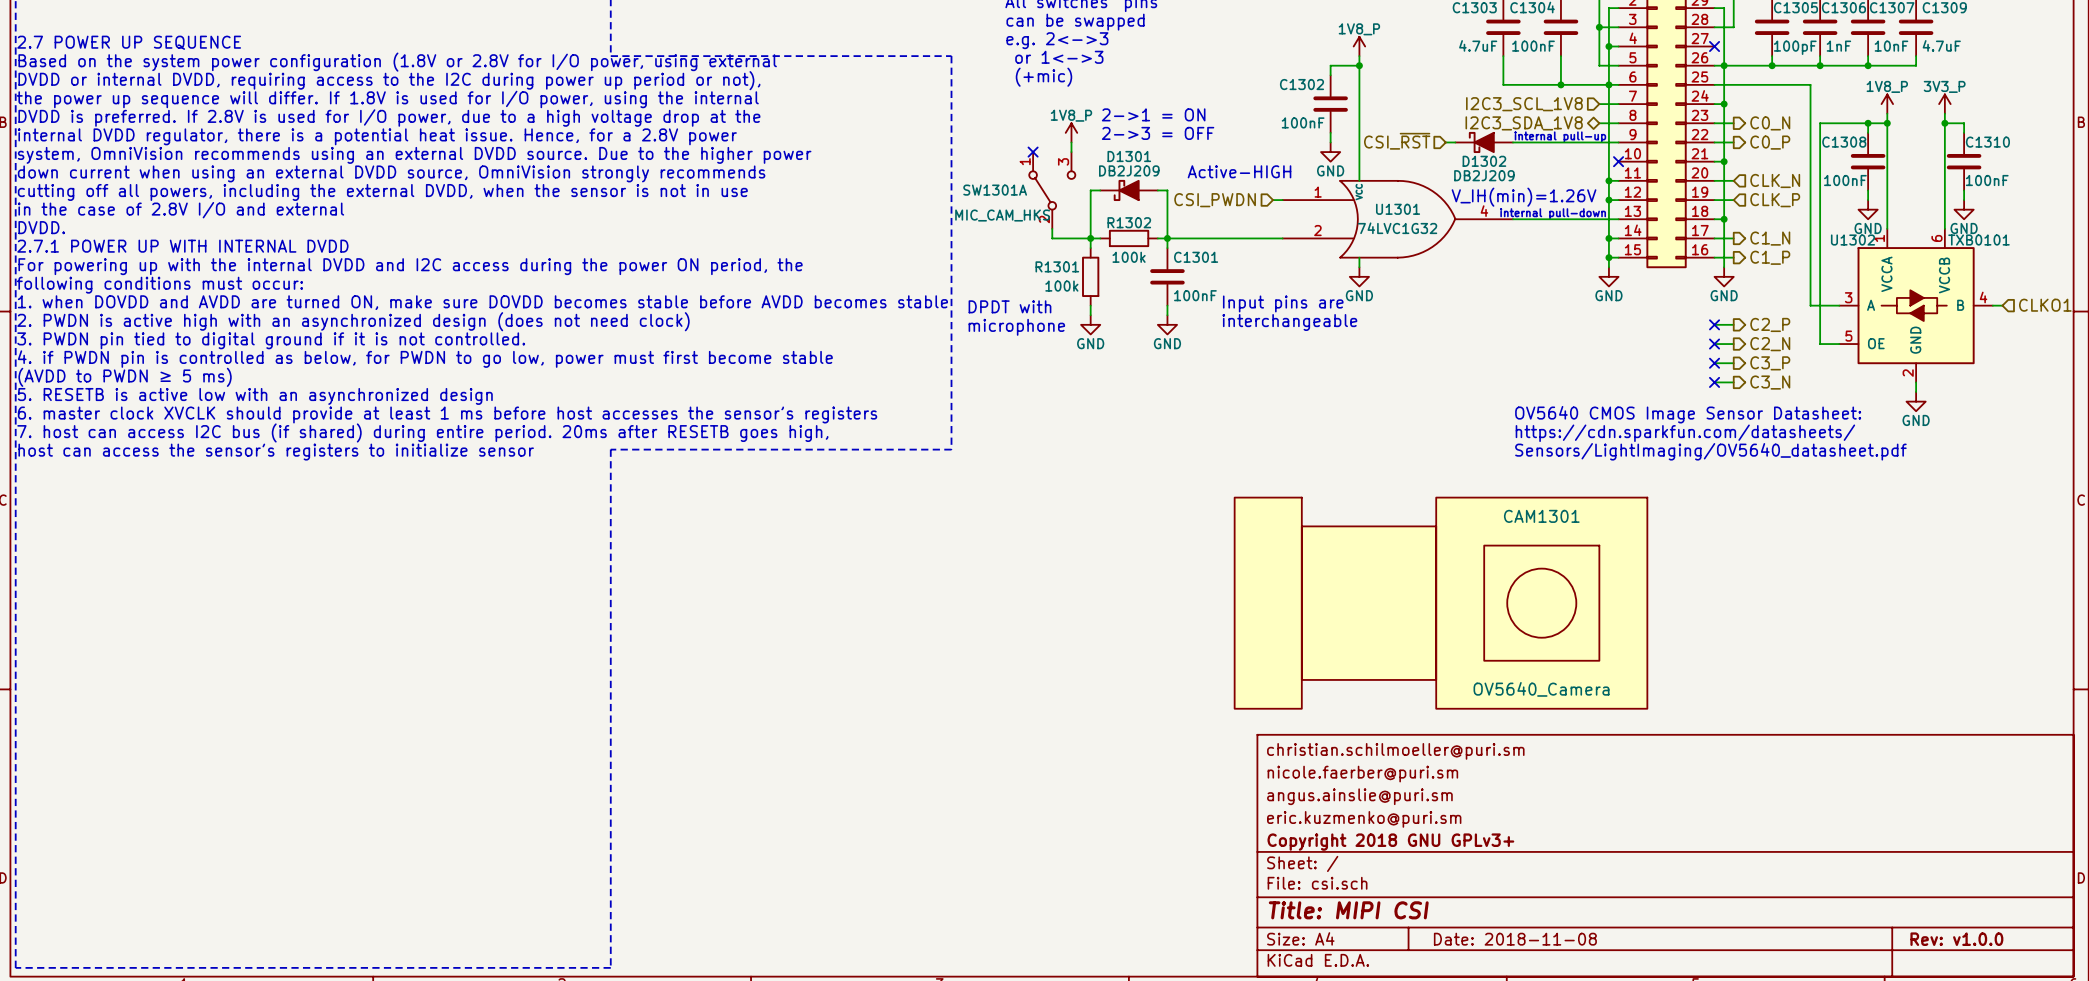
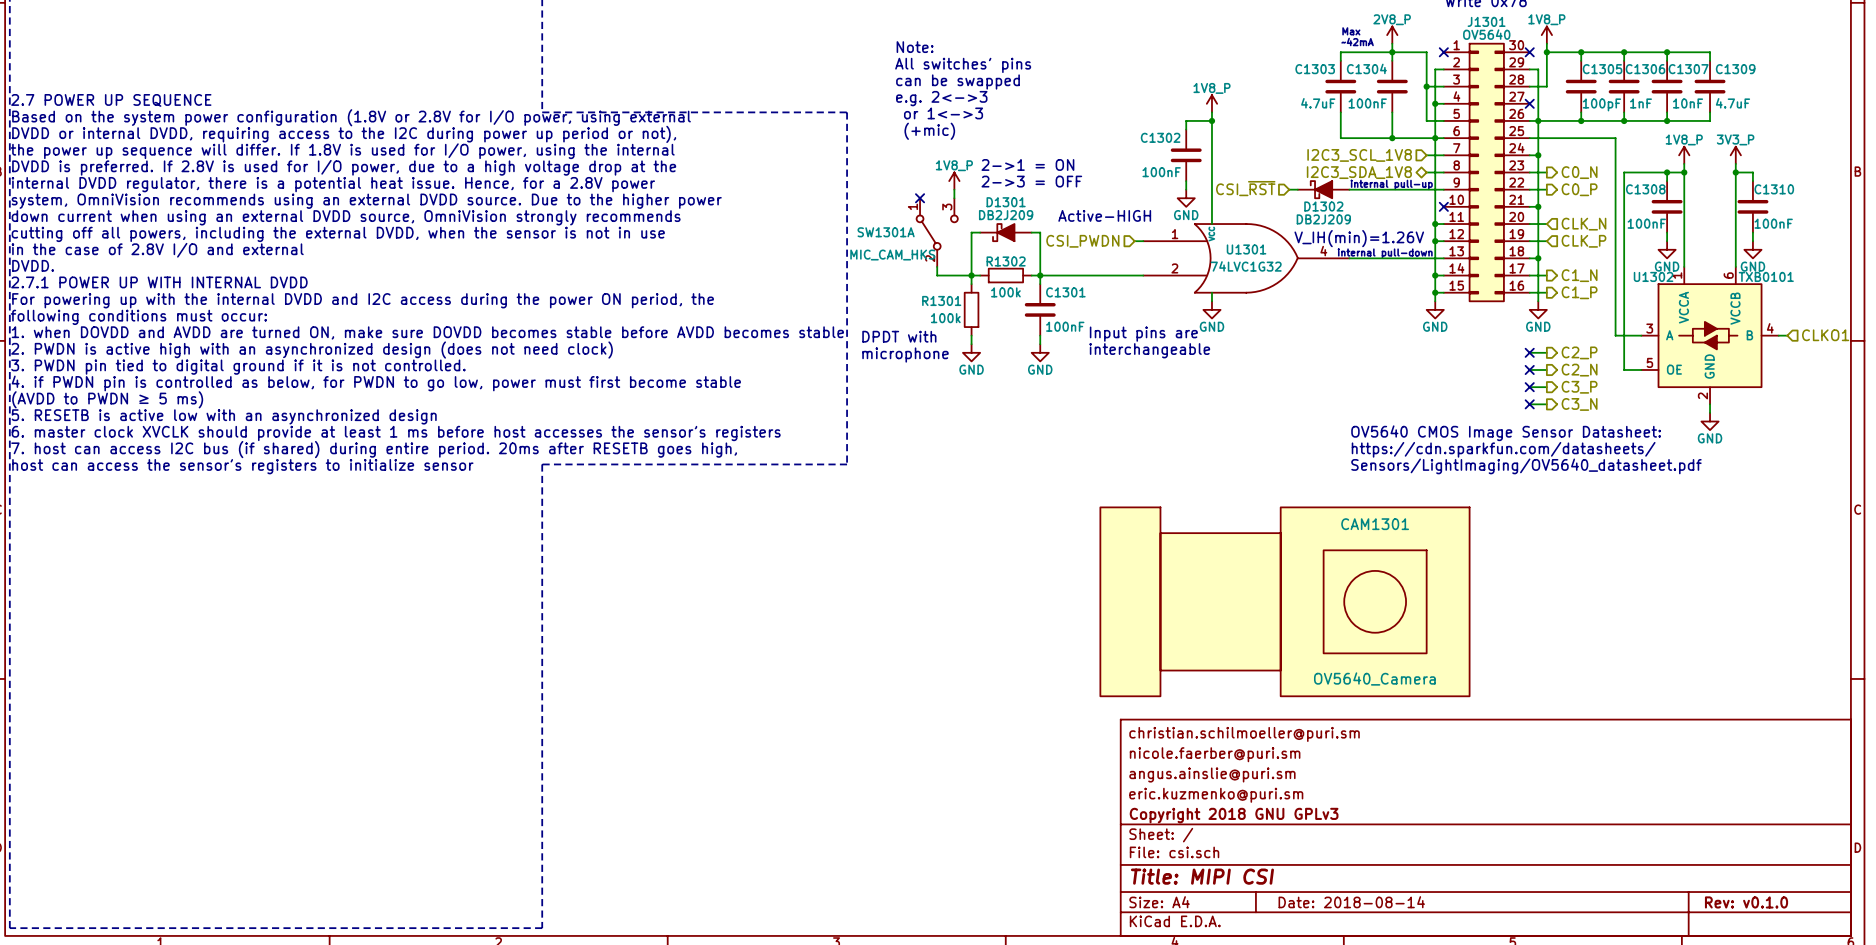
title block: Copyright 2018 GNU GPLv3+ (1390, 842) -> Copyright 2018 GNU GPLv3 (1234, 815)
title block: Date: 2018-11-08 (1515, 939) -> Date: 2018-08-14 (1351, 902)
title block: Rev: v1.0.0 (1956, 939) -> Rev: v0.1.0 (1746, 902)

